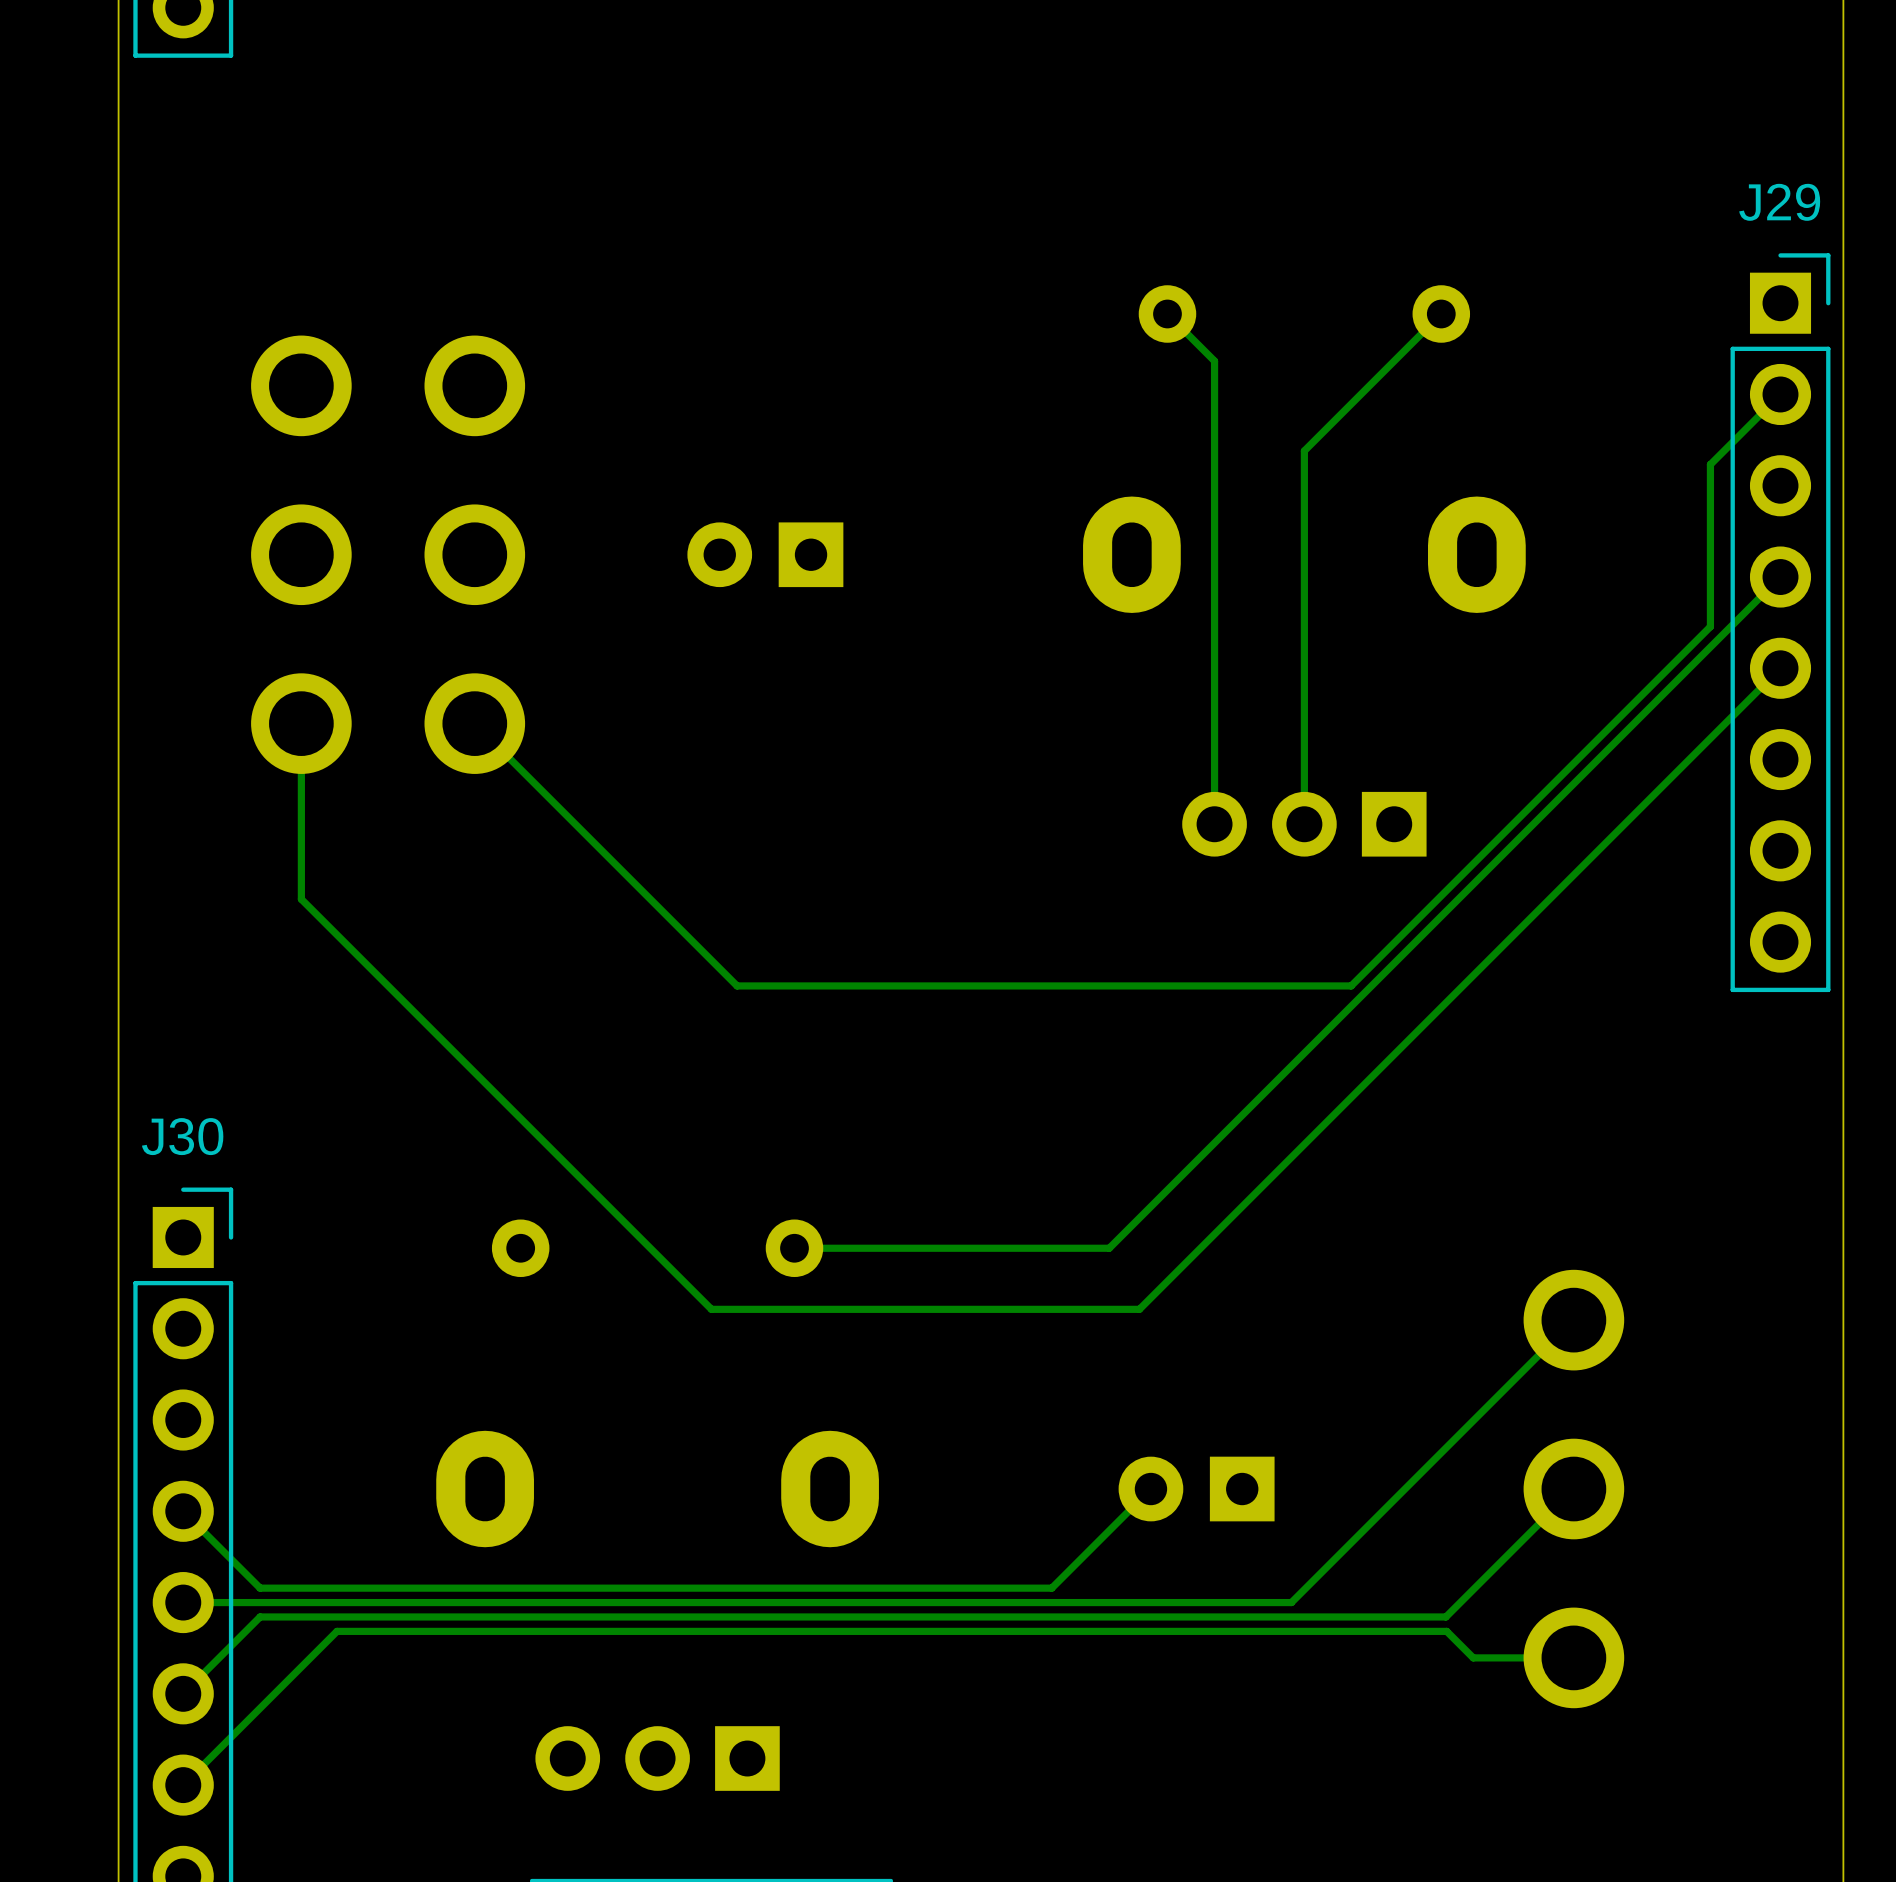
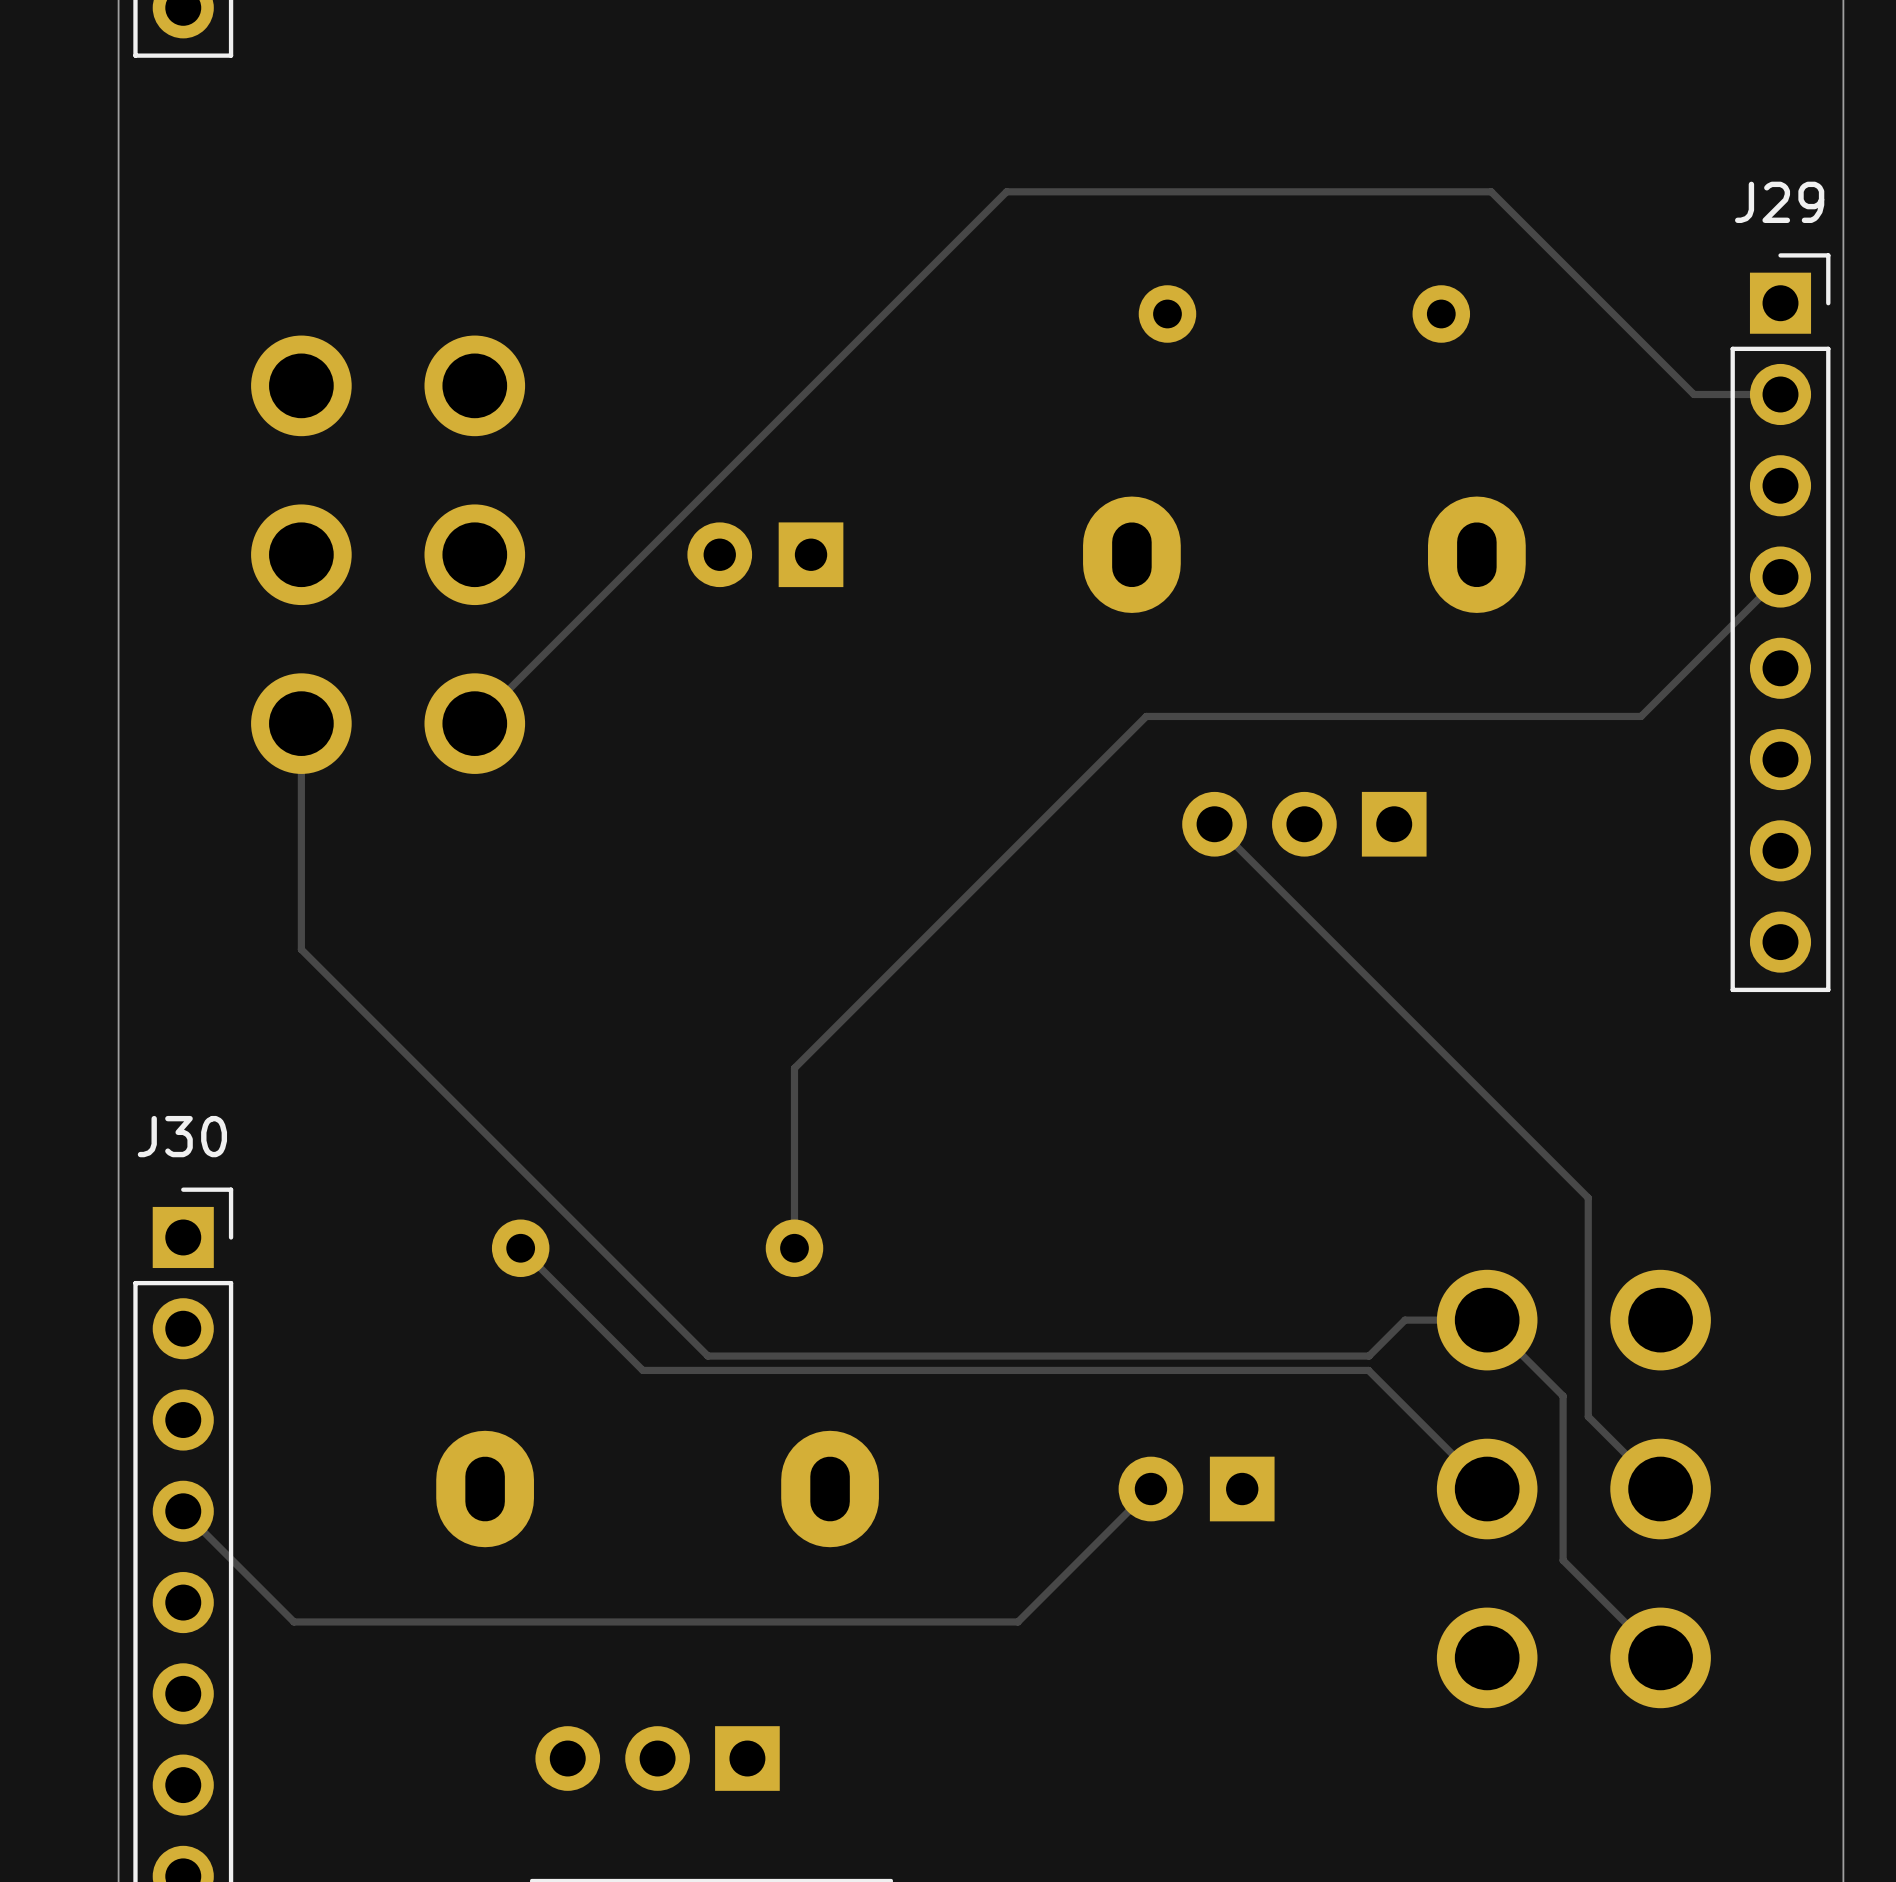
track: (1167, 313) (1214, 361) (1214, 824) -> (1660, 1489) (1588, 1416) (1588, 1197) (1214, 824)
track: (1441, 313) (1304, 450) (1304, 824) -> none
track: (1780, 394) (1710, 464) (1710, 626) (1351, 985) (737, 985) (474, 723) -> (1780, 394) (1693, 394) (1491, 191) (1006, 191) (474, 723)
track: (1780, 668) (1139, 1309) (711, 1309) (301, 899) -> (1660, 1657) (1563, 1560) (1563, 1396) (1487, 1320) (1405, 1320) (1369, 1356) (707, 1356) (301, 949) (301, 899)
track: (1641, 716) (1109, 1248) (794, 1248) -> (1641, 716) (1146, 716) (794, 1068) (794, 1248)
track: none -> (520, 1248) (642, 1370) (1368, 1370) (1487, 1489)
part footprint: [1523, 1269, 1625, 1709] -> [1436, 1269, 1711, 1709]
track: (1573, 1320) (1291, 1602) (183, 1602) -> none
track: (1573, 1489) (1445, 1616) (260, 1616) (183, 1693) -> none
track: (1051, 1588) (260, 1588) -> (1051, 1588) (1018, 1621) (293, 1621) (260, 1588)
track: (1573, 1657) (1473, 1657) (1446, 1631) (336, 1631) (183, 1785) -> none

